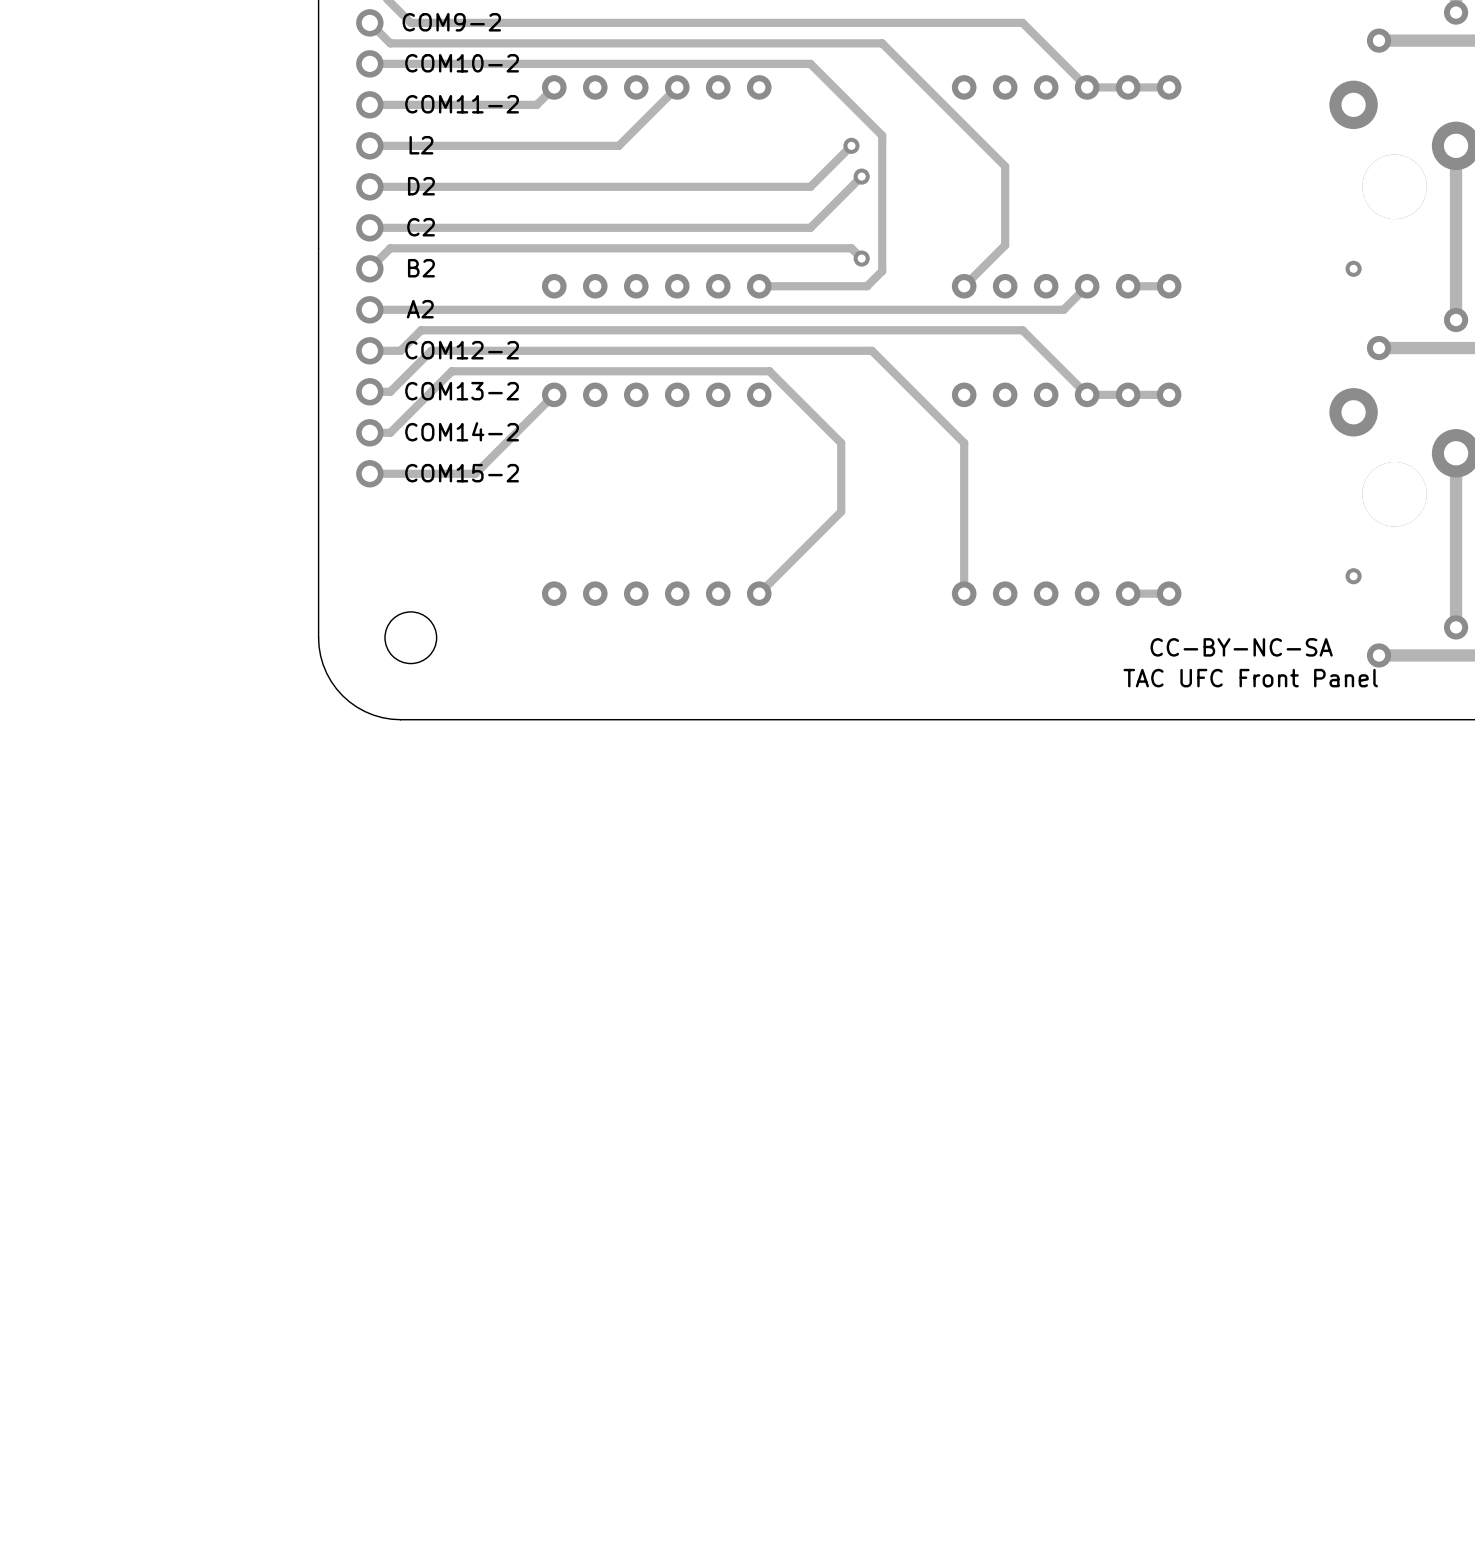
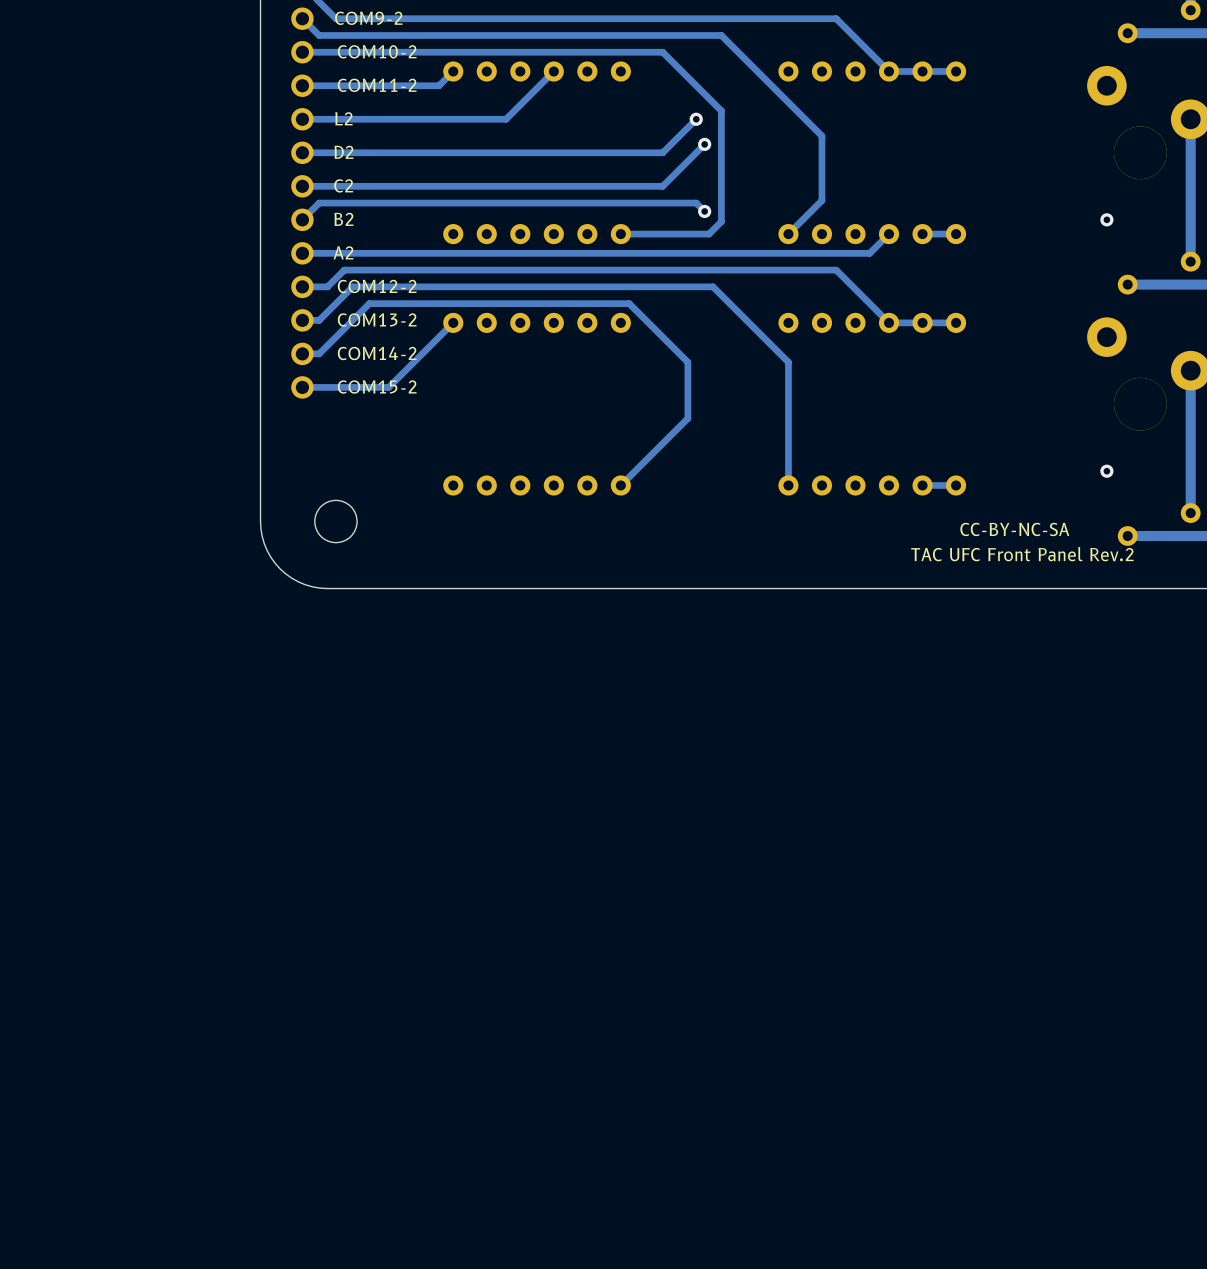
text: TAC UFC Front Panel (1250, 678) -> TAC UFC Front Panel Rev.2 (1022, 554)

